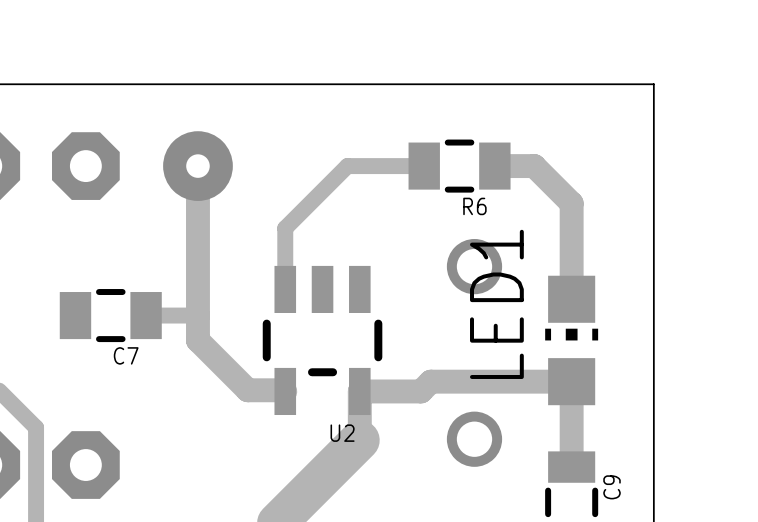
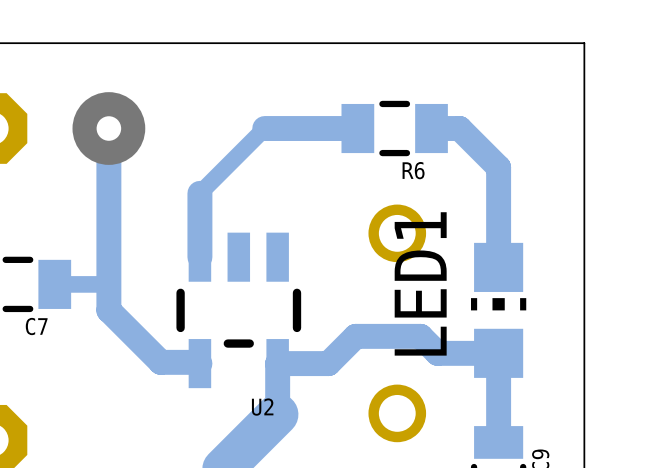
track width: thin (424, 166) (347, 166) -> thick (344, 128) (264, 128)
R6 position: (459, 166) -> (394, 128)
track width: thin (285, 228) (285, 289) -> thick (199, 193) (199, 257)
track: (513, 381) (430, 381) (421, 391) (408, 391) -> (437, 353) (420, 336) (355, 336) (328, 363)

